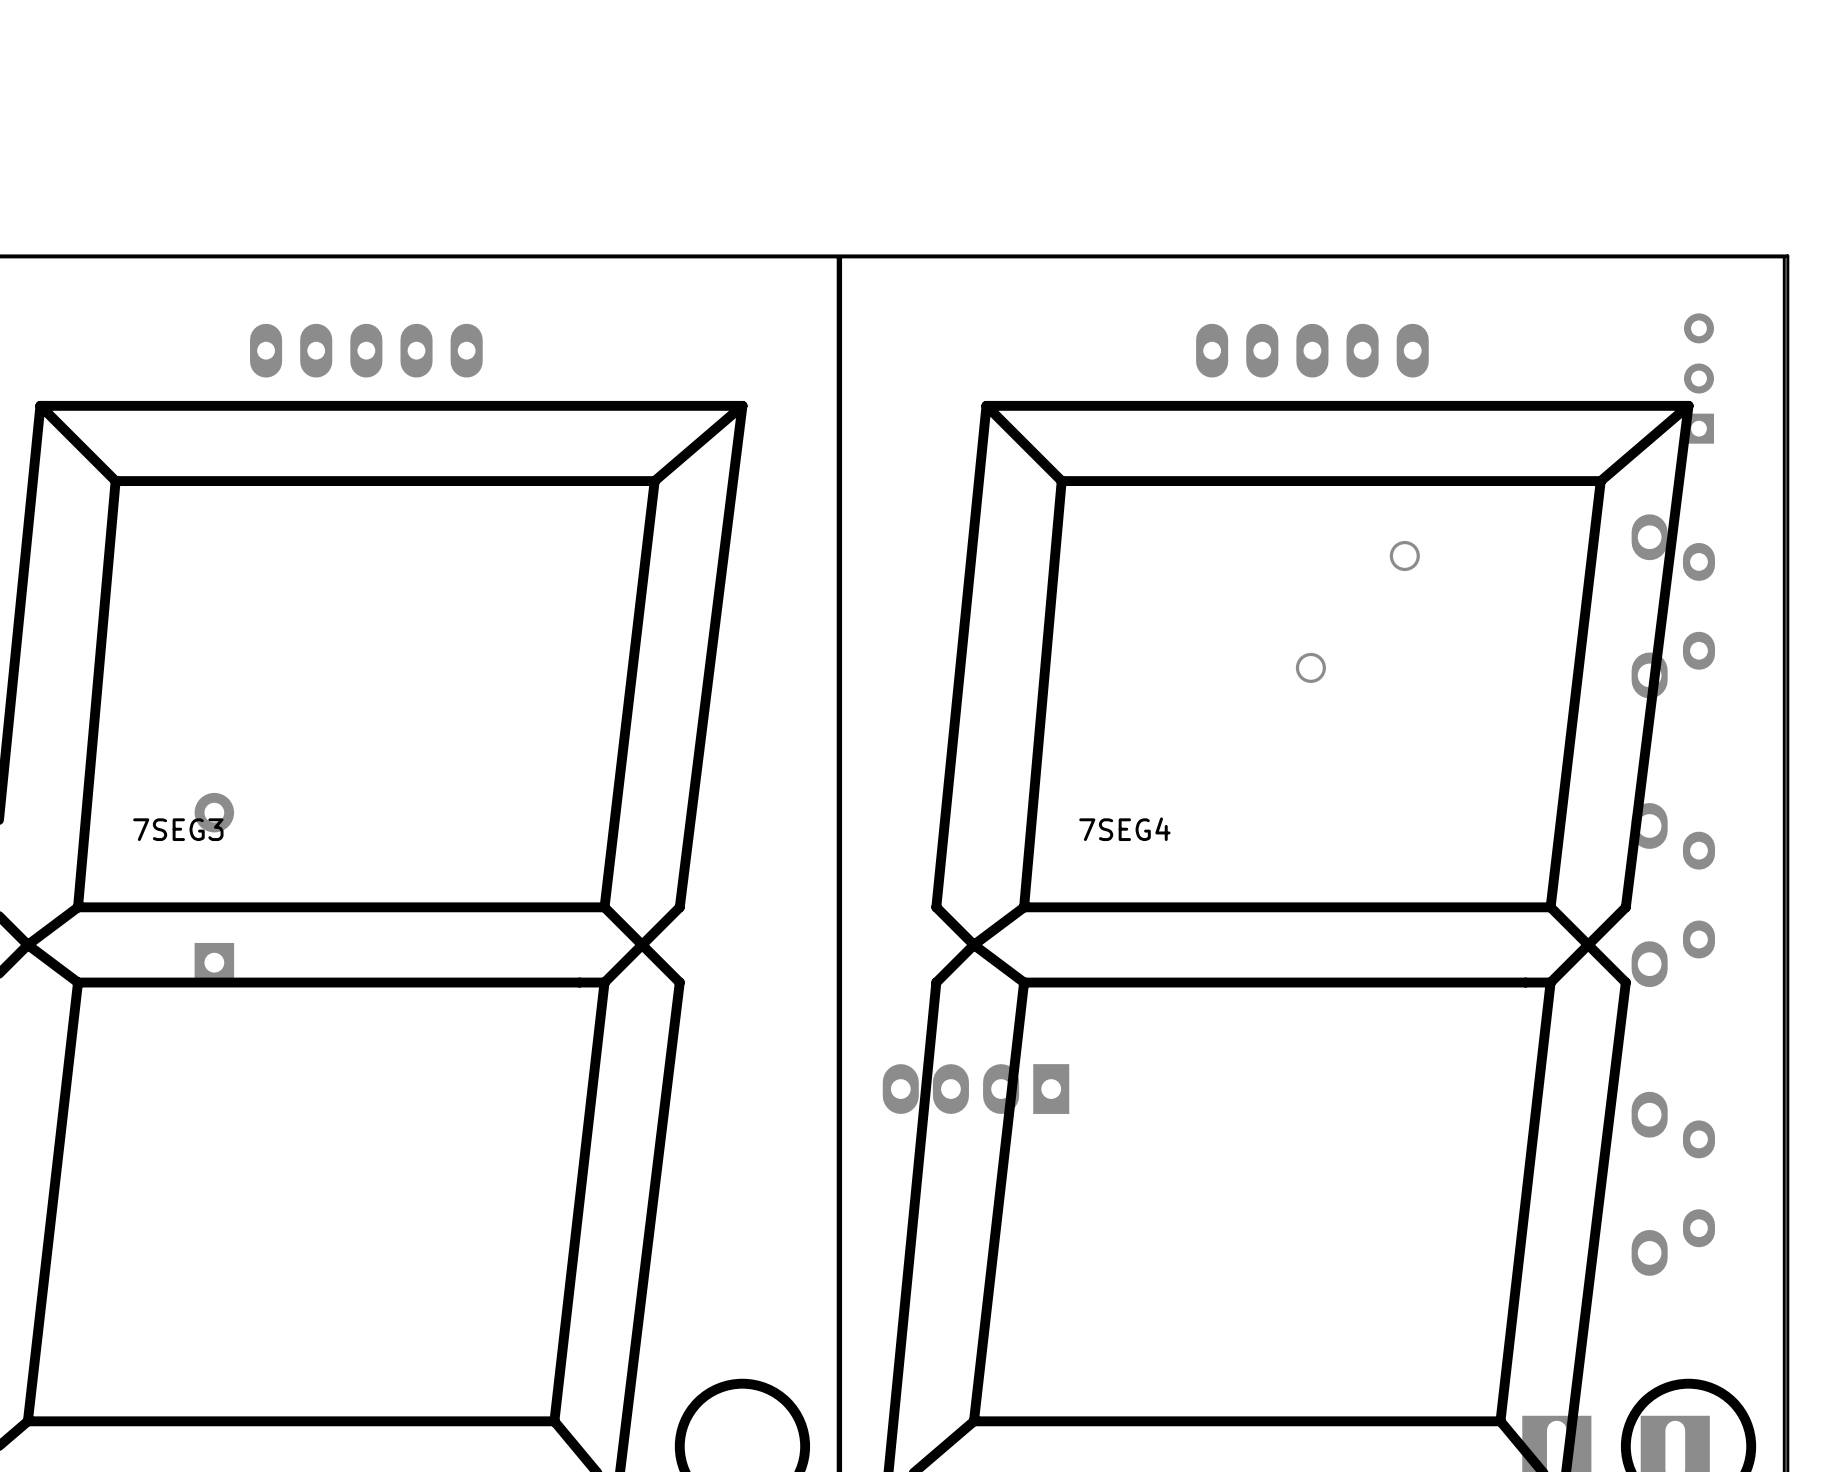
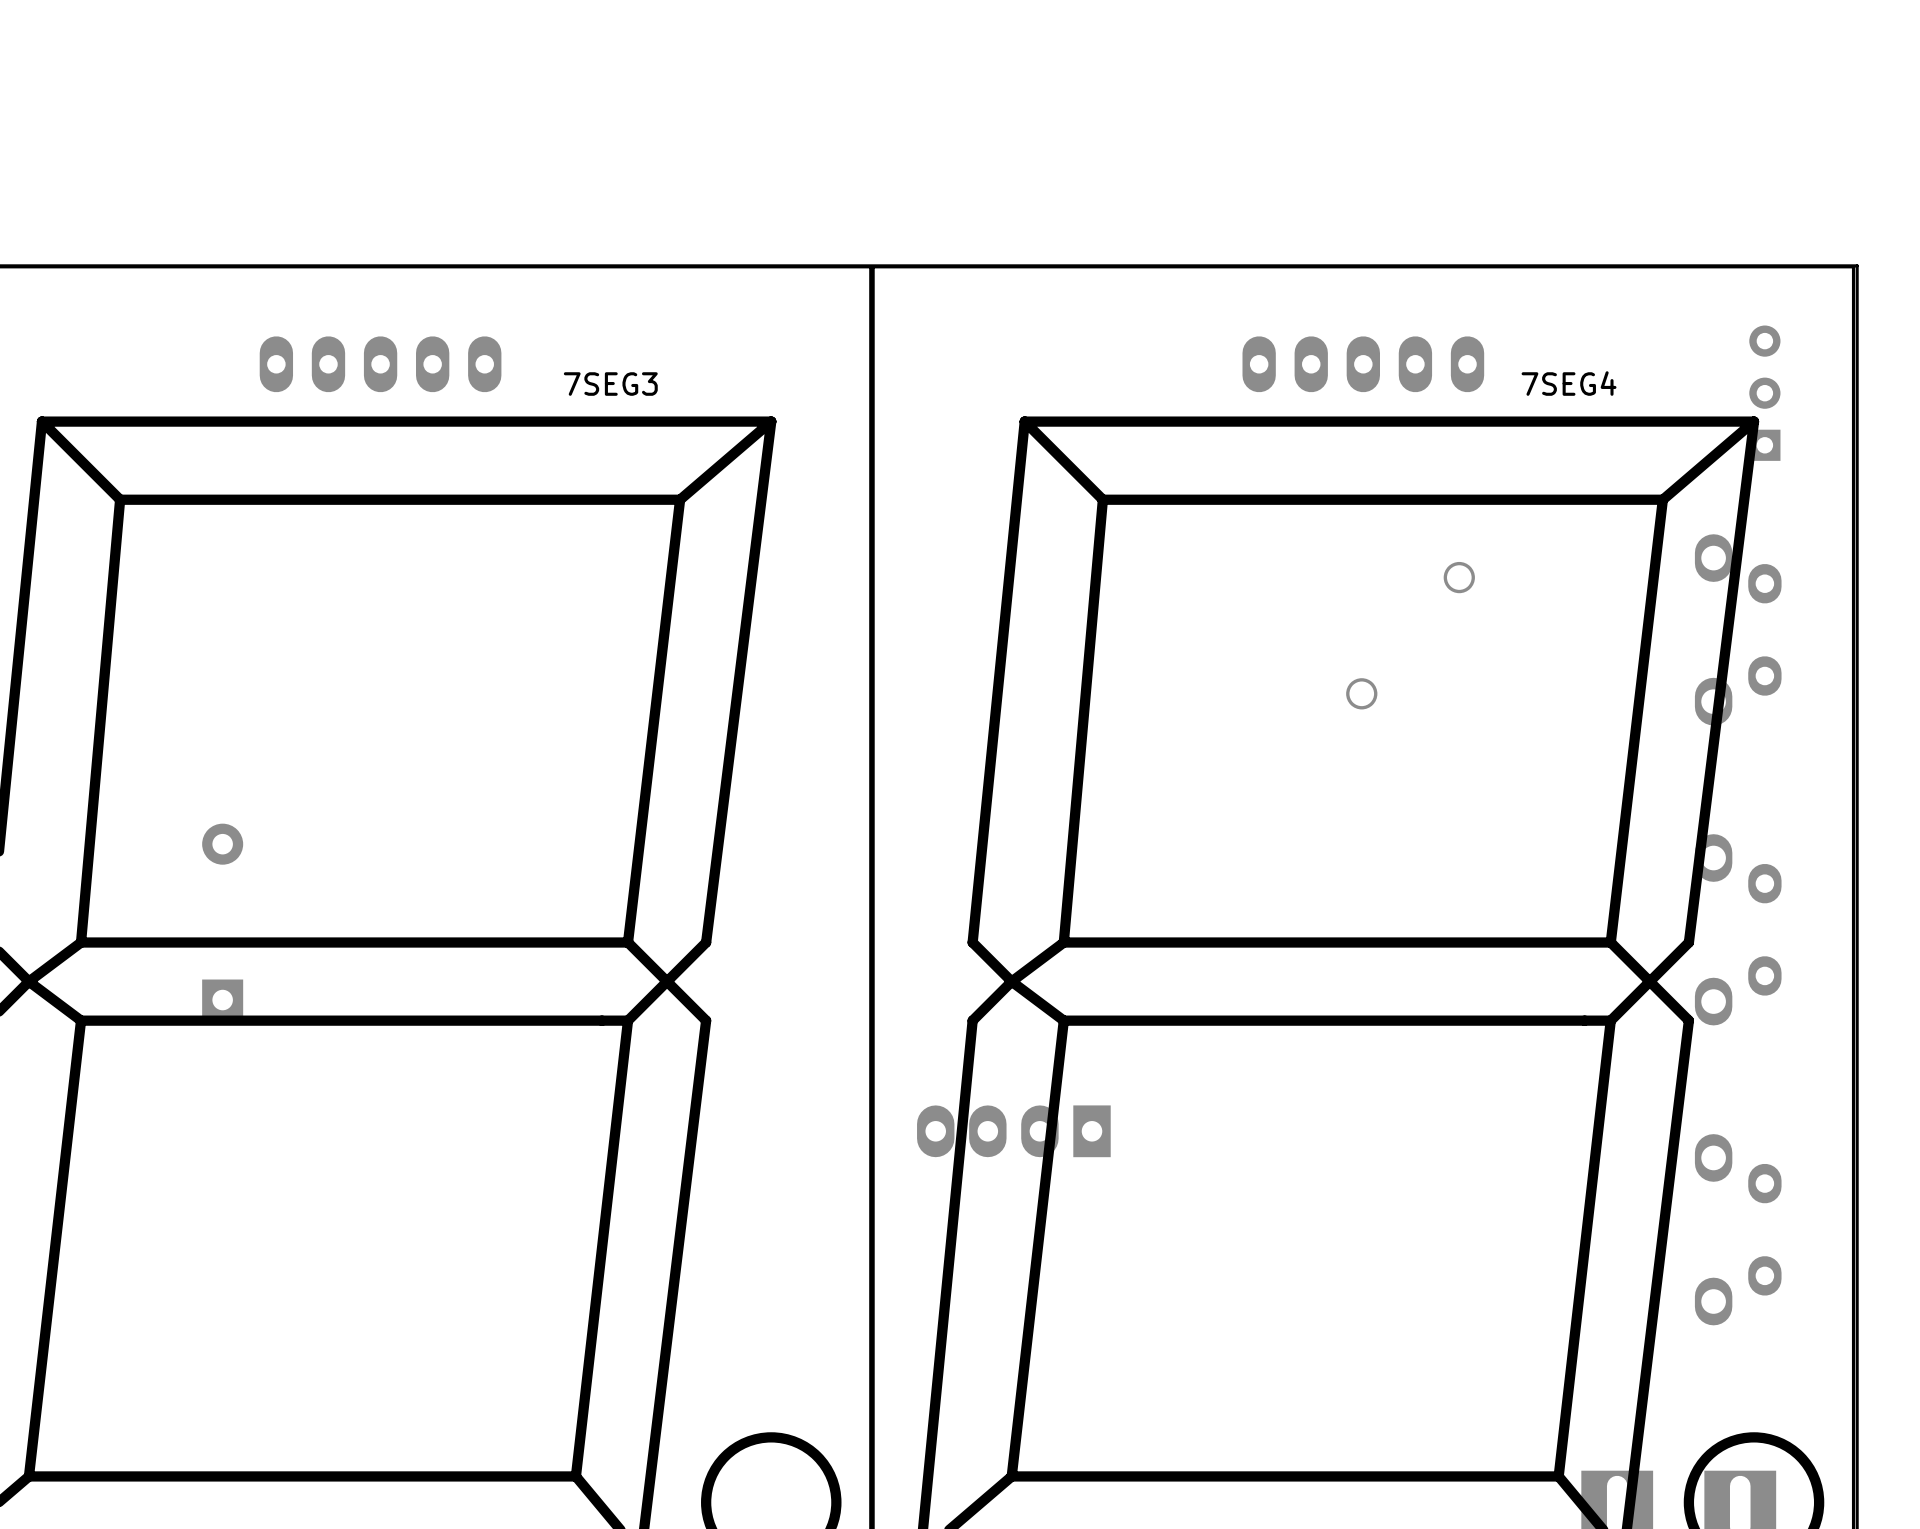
7SEG3 name position: 7SEG3 (178, 829) -> 7SEG3 (610, 384)
7SEG4 name position: 7SEG4 (1124, 829) -> 7SEG4 (1569, 383)

